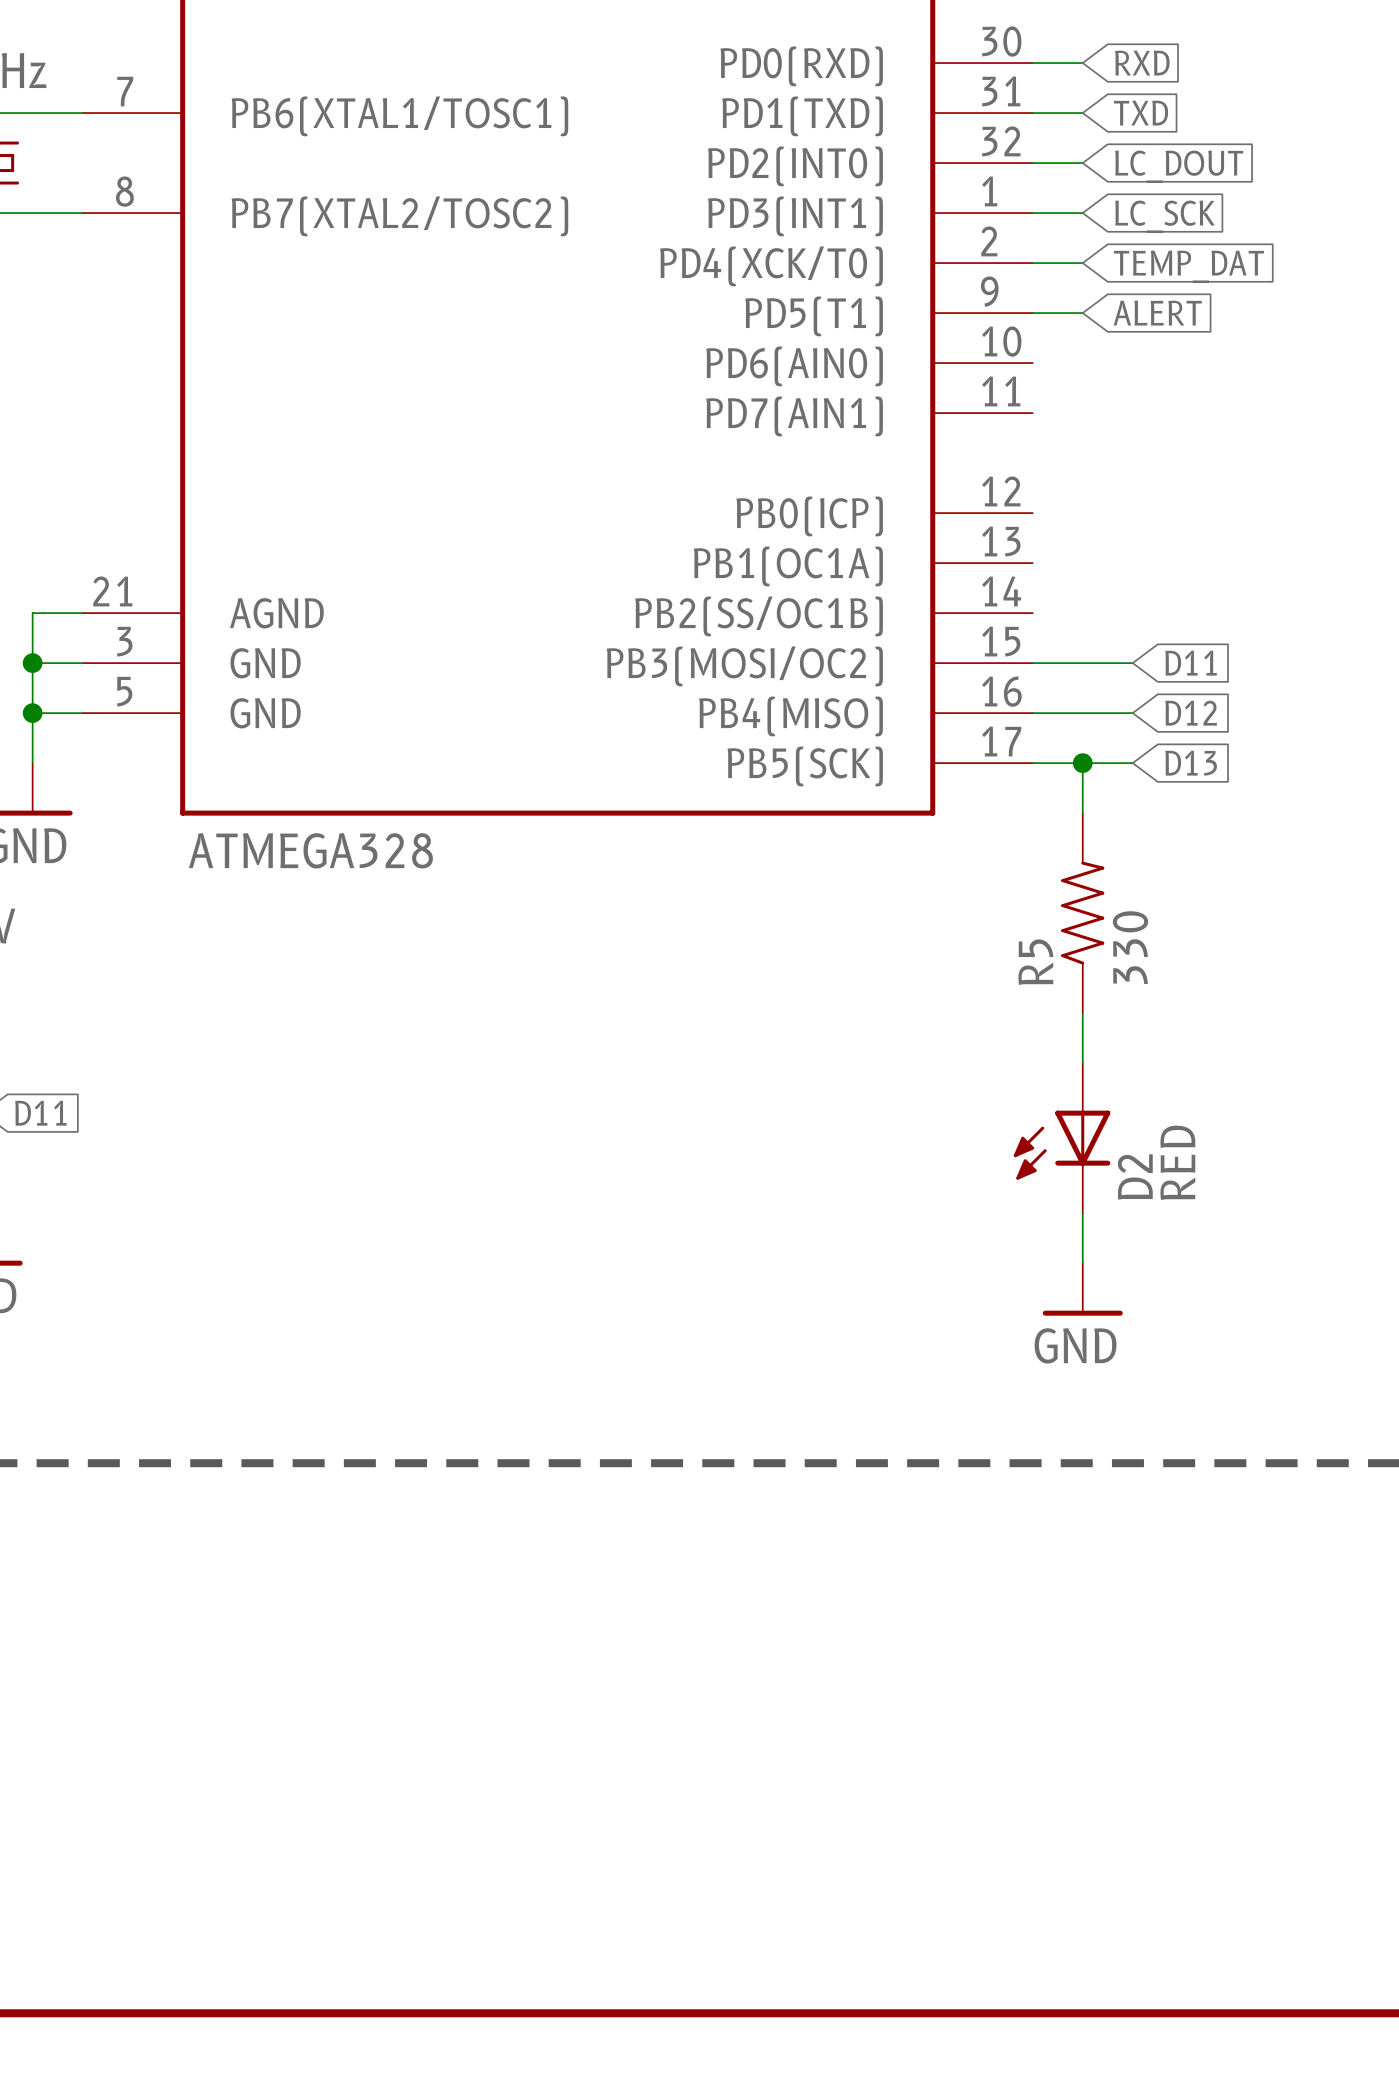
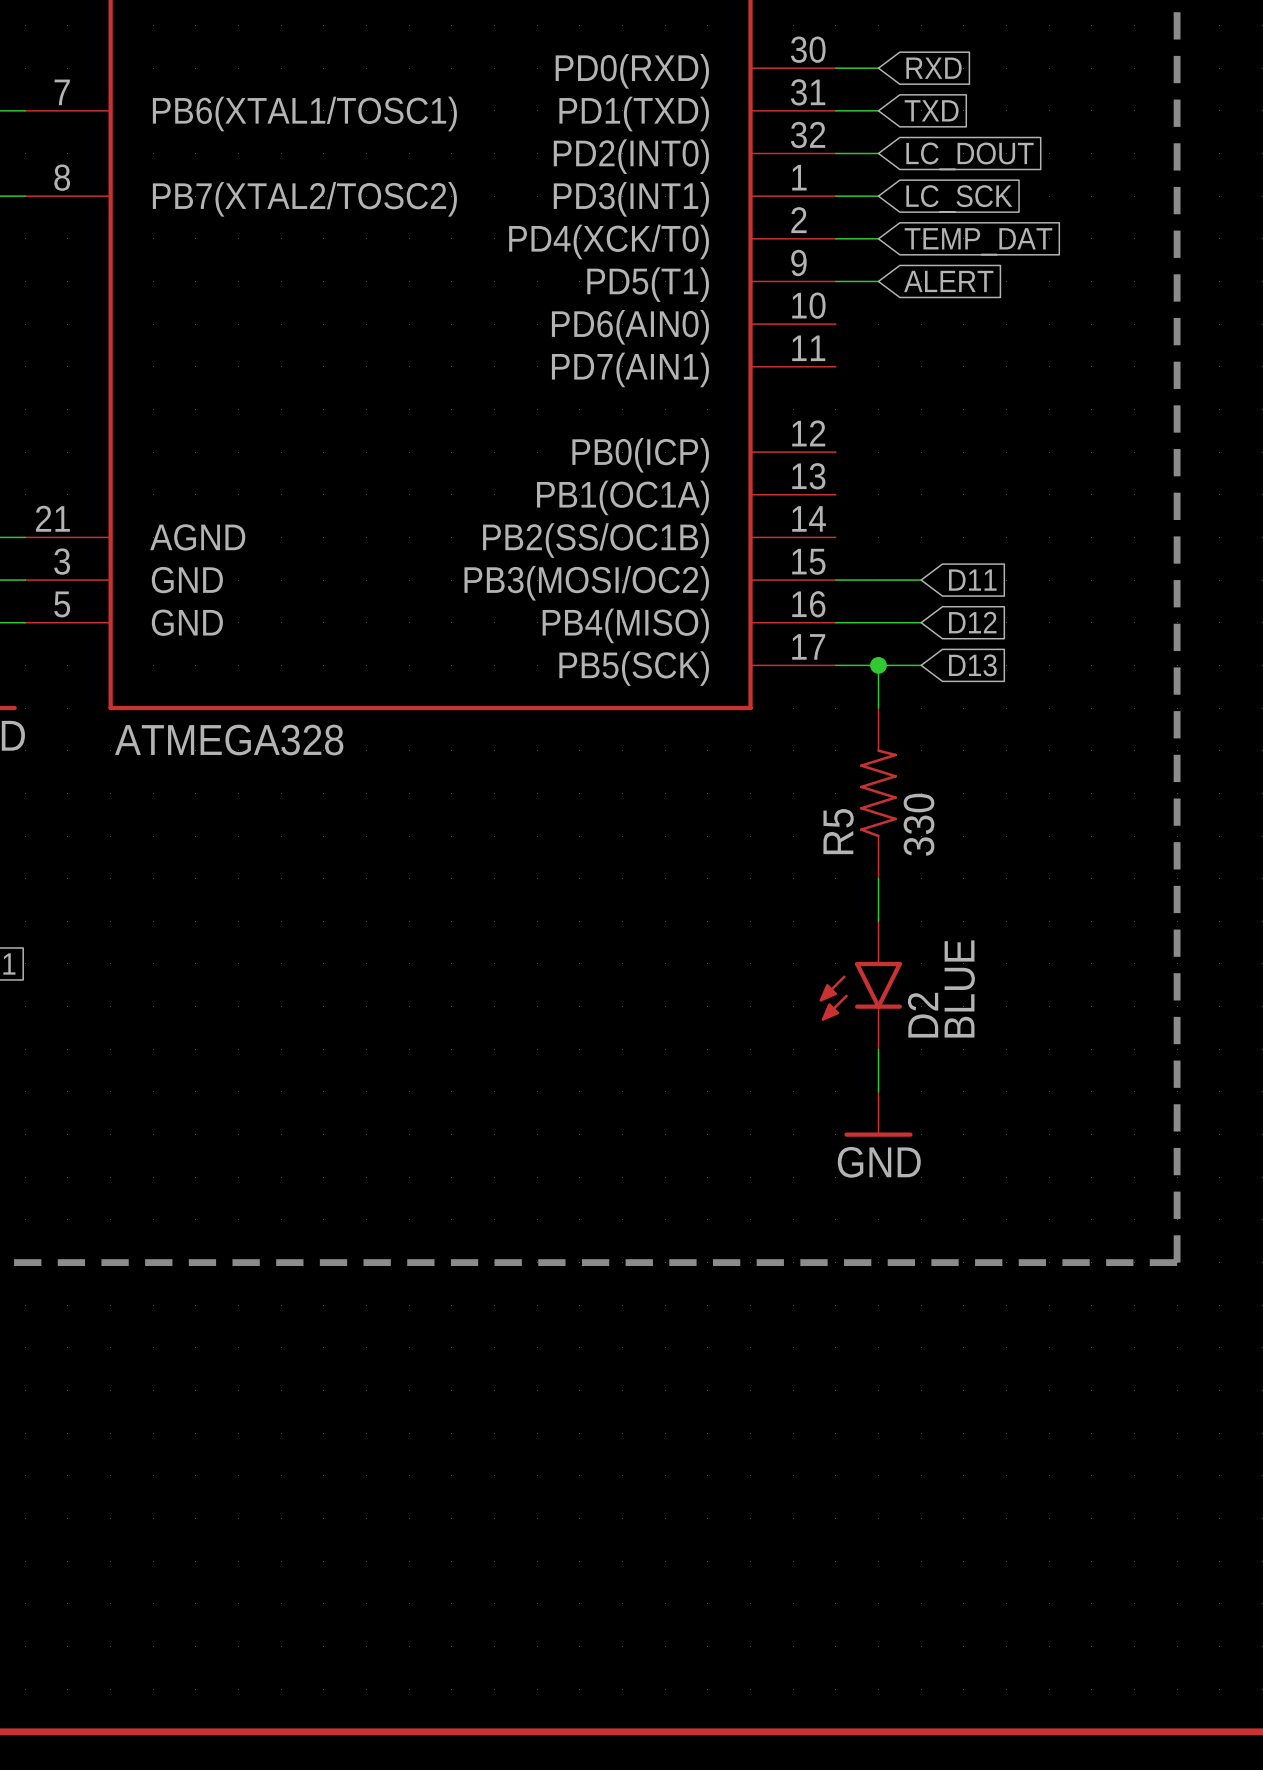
D2 symbol: [1013, 1063, 1111, 1214] -> [819, 921, 902, 1050]
D2 value: RED (1177, 1162) -> BLUE (959, 988)

